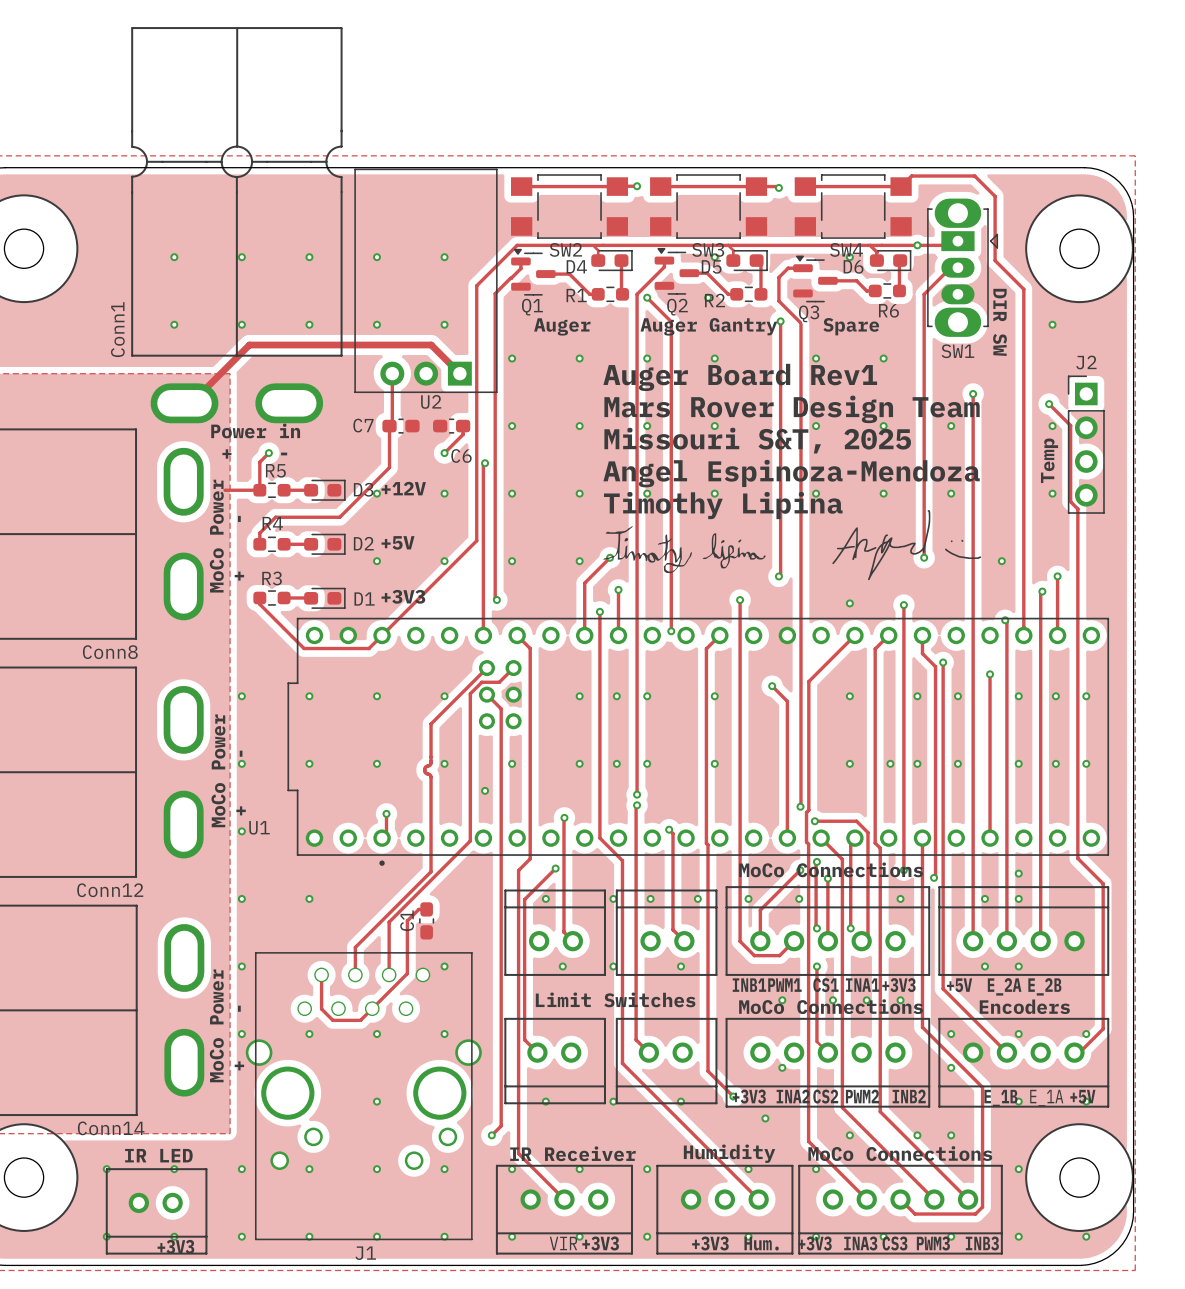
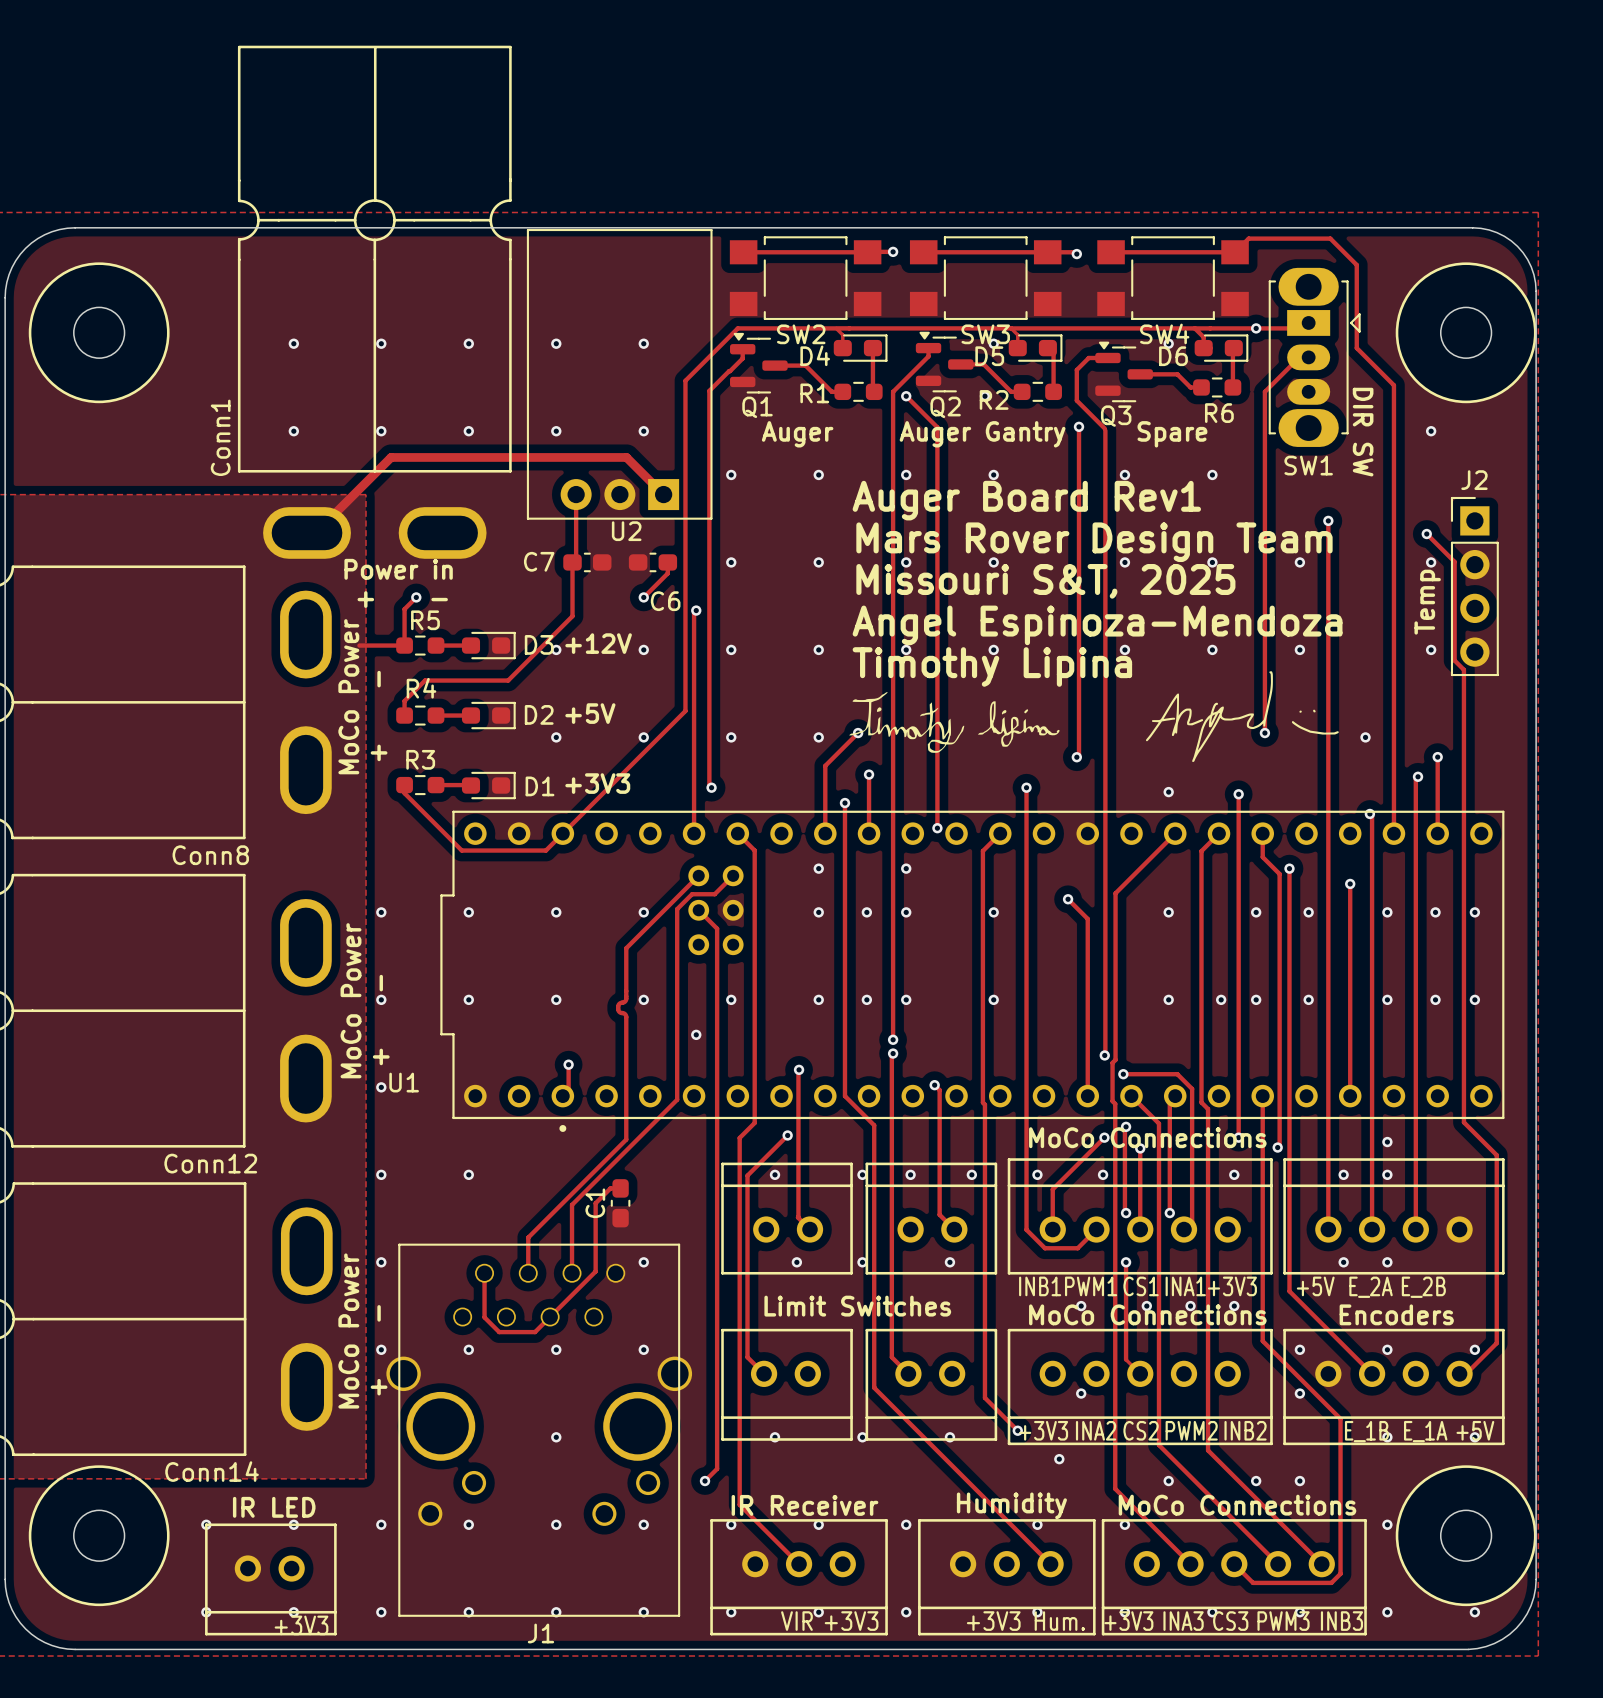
via: none -> (818, 868)
via: none -> (906, 868)

